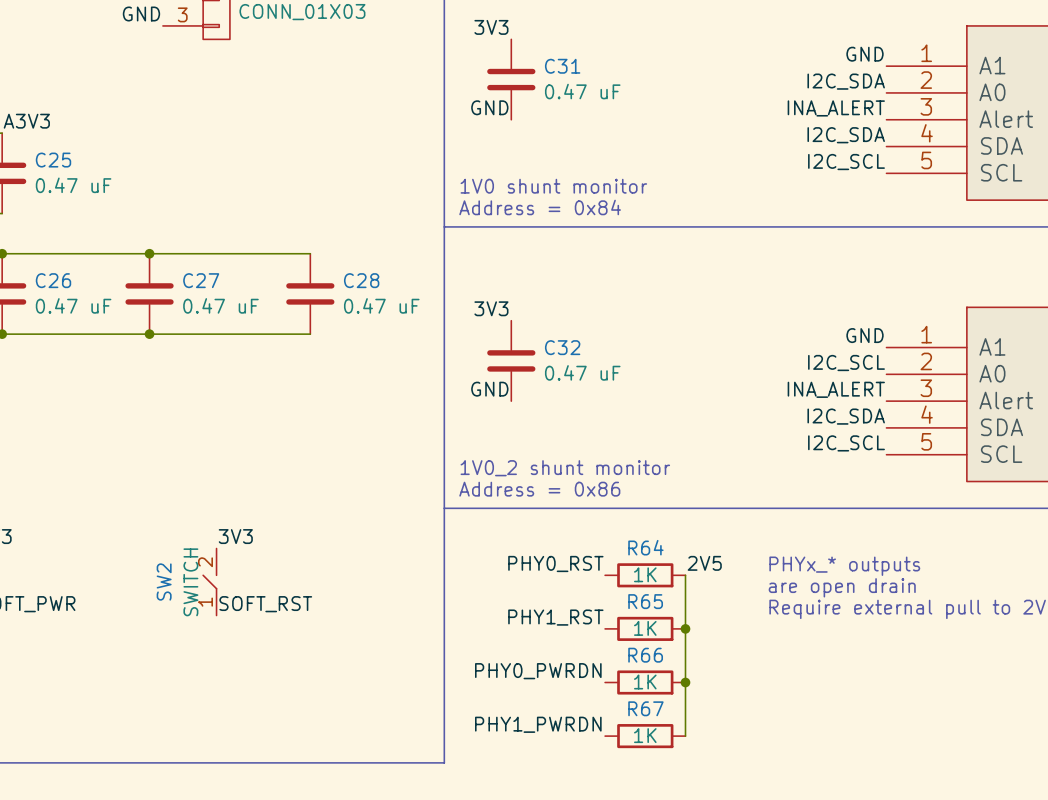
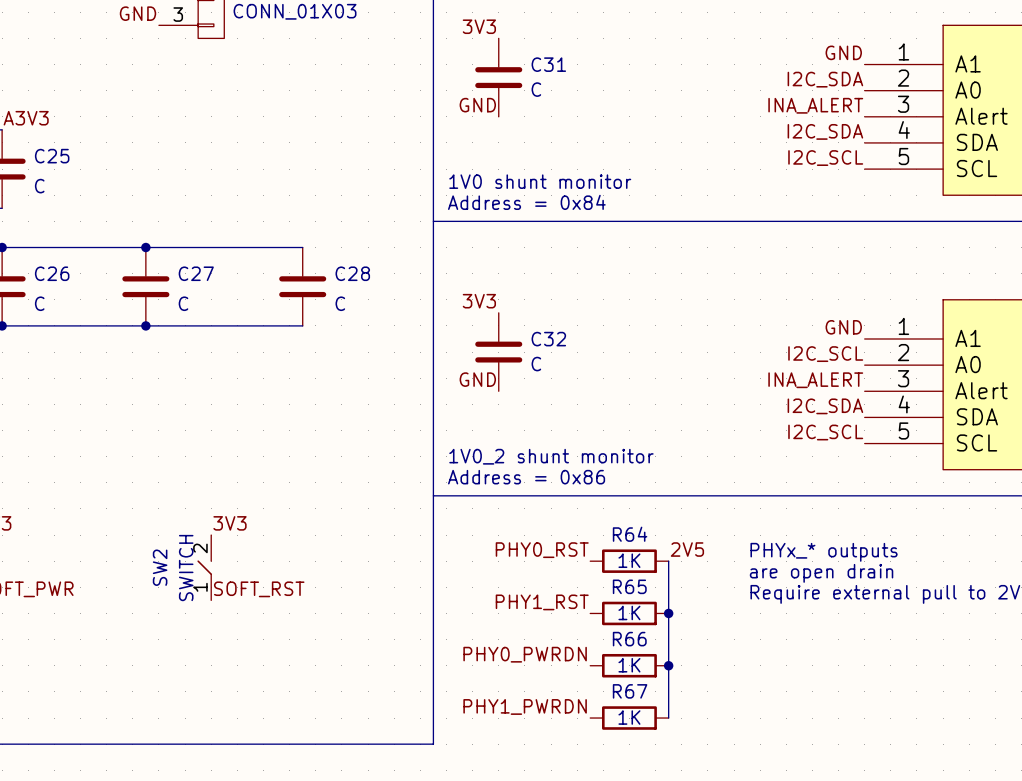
C31 value: 0.47 uF (582, 91) -> C (536, 89)
C25 value: 0.47 uF (73, 185) -> C (39, 186)
C26 value: 0.47 uF (73, 305) -> C (39, 303)
C27 value: 0.47 uF (220, 305) -> C (183, 303)
C28 value: 0.47 uF (381, 305) -> C (340, 303)
C32 value: 0.47 uF (582, 372) -> C (536, 364)

